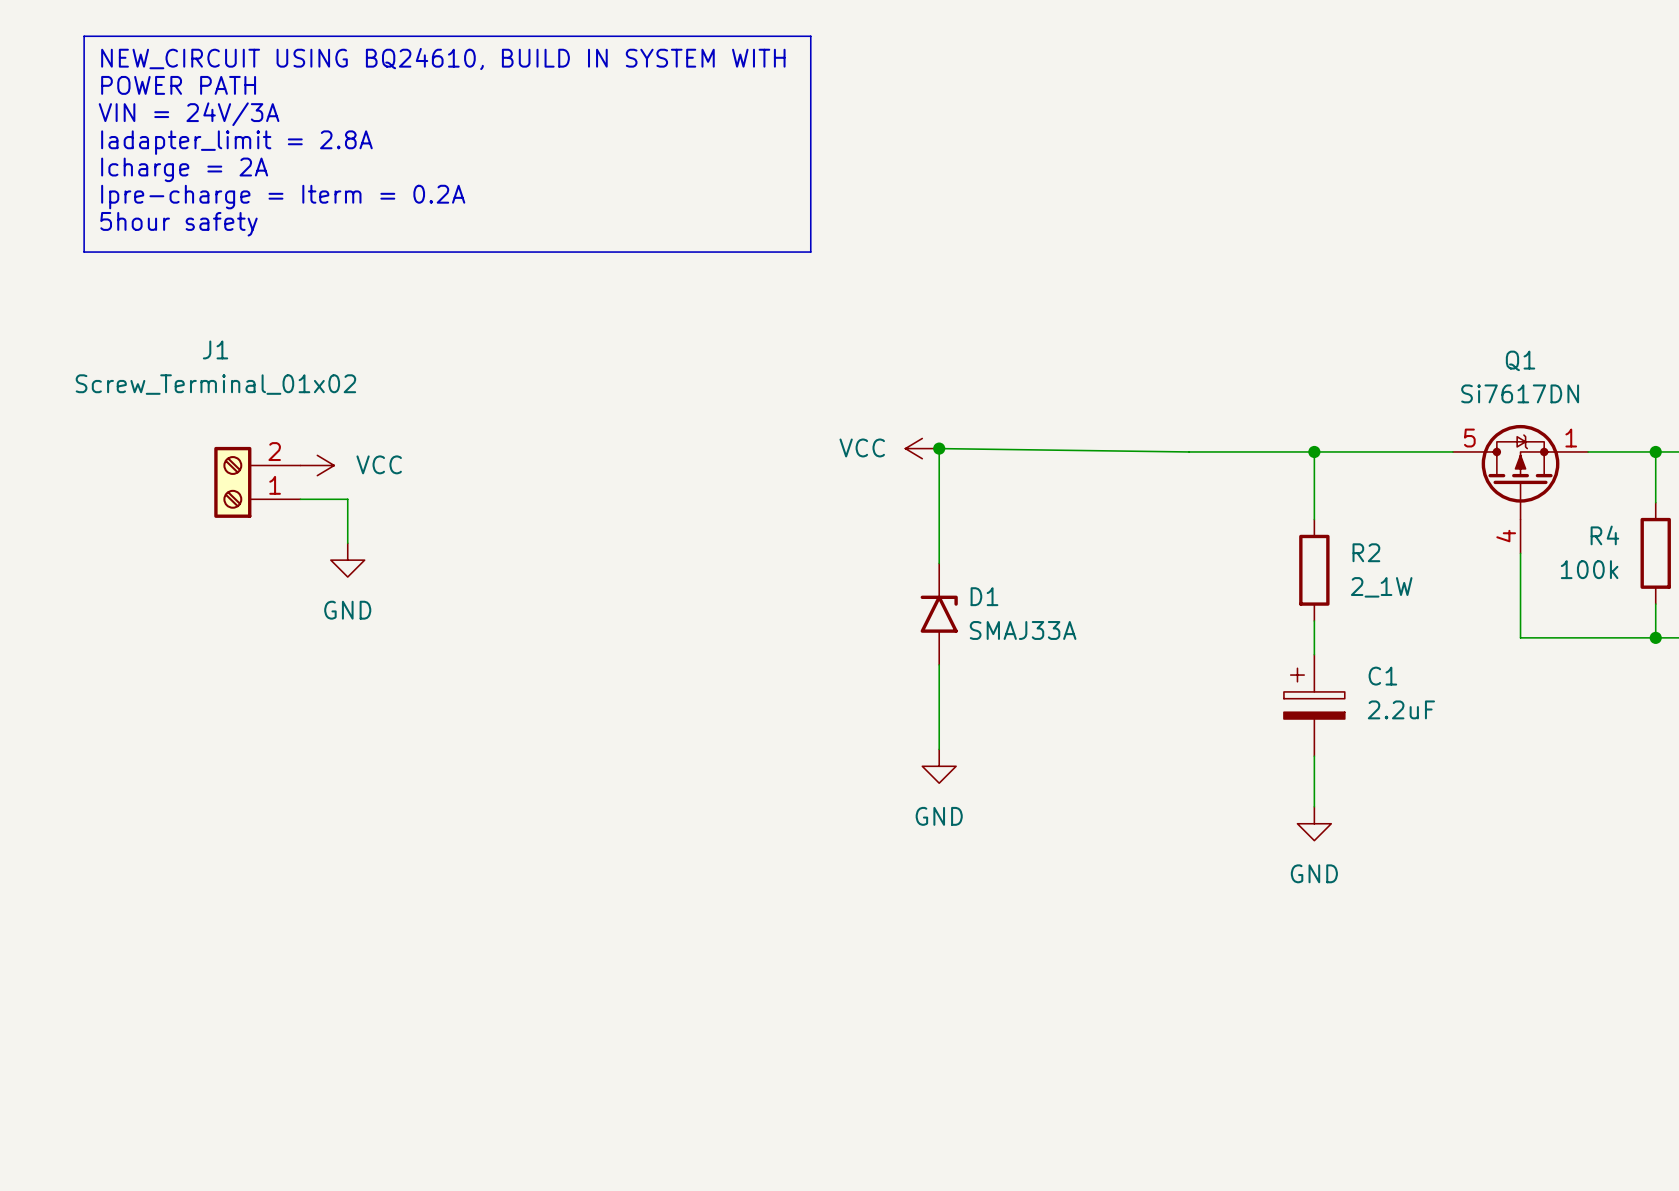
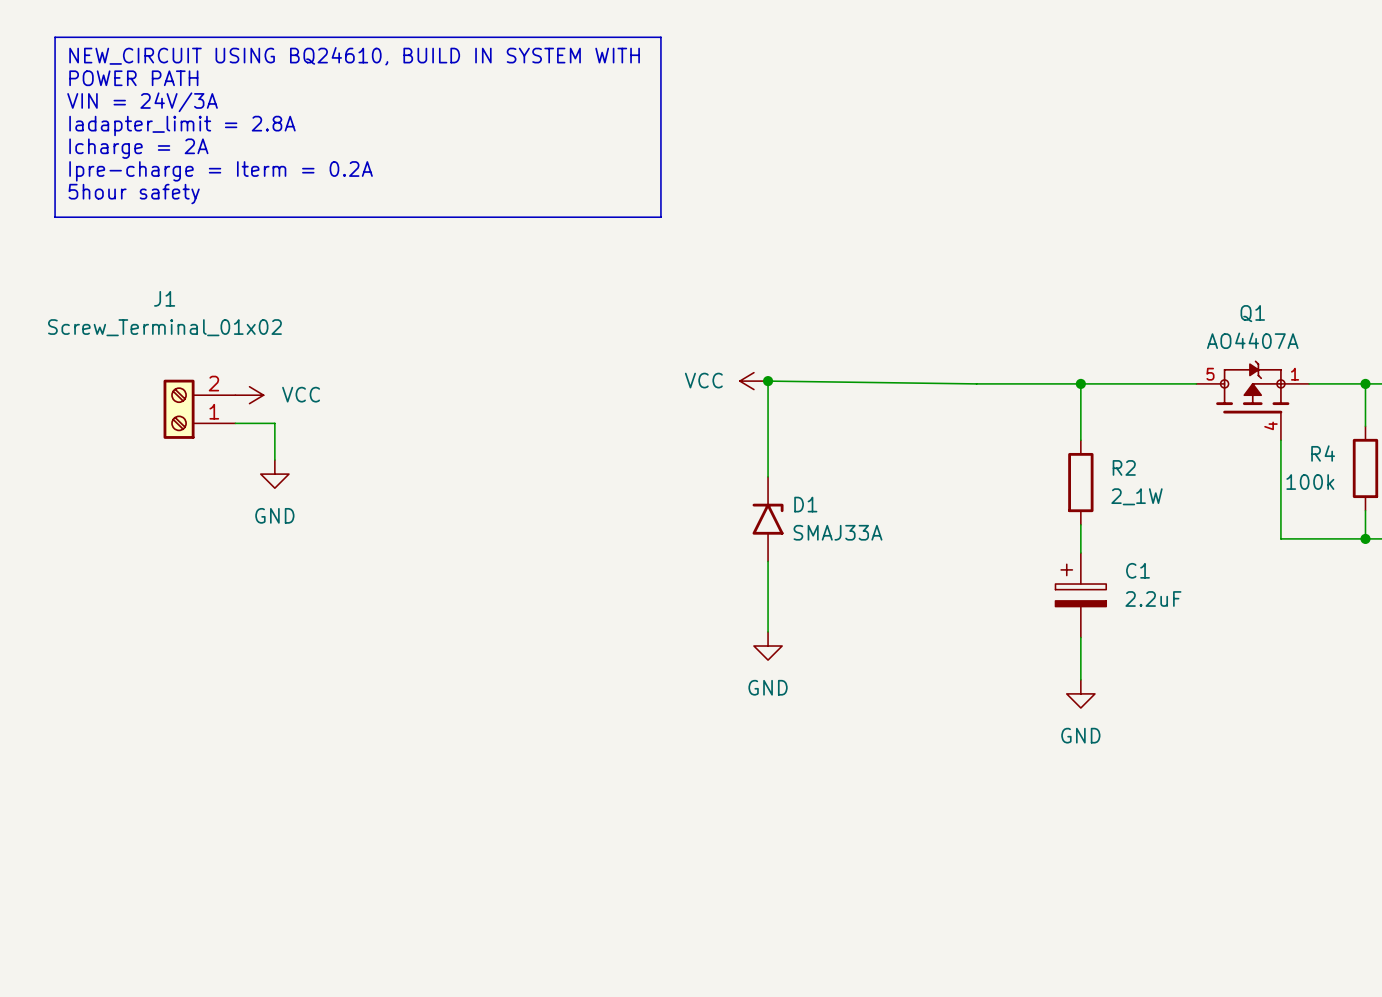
Q1 value: Si7617DN (1520, 393) -> AO4407A (1252, 340)
Q1 symbol: [1452, 424, 1589, 554] -> [1196, 360, 1310, 441]
wire: (1520, 553) (1520, 637) (1554, 637) -> (1280, 440) (1280, 538)

